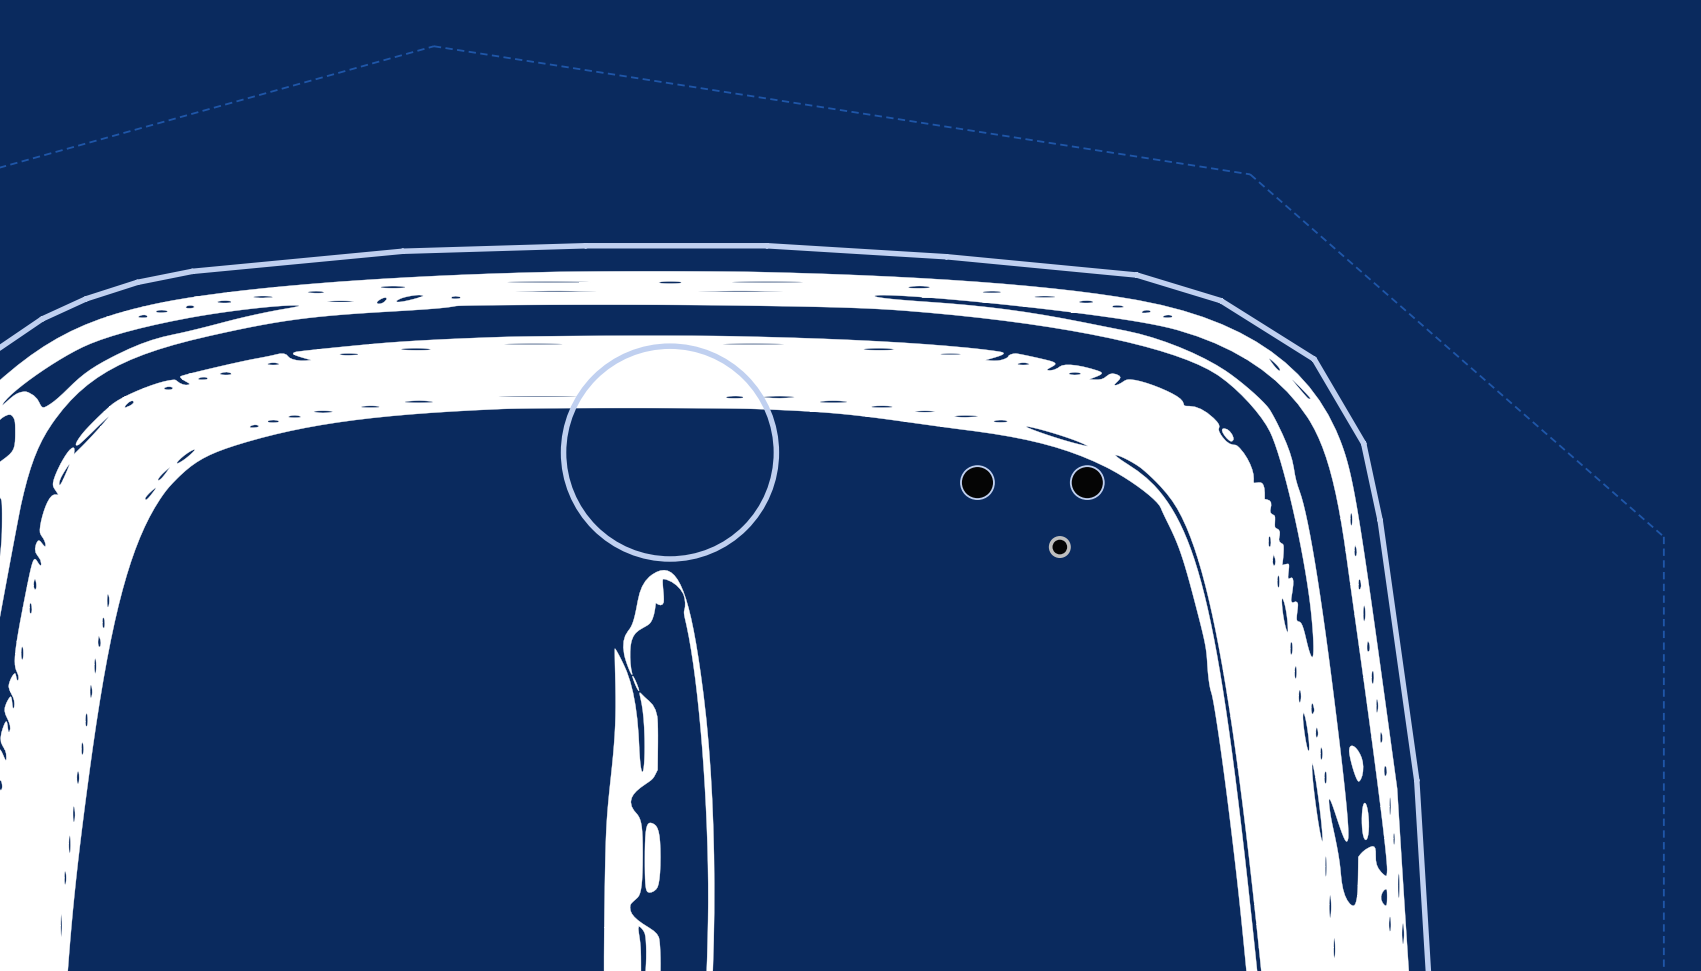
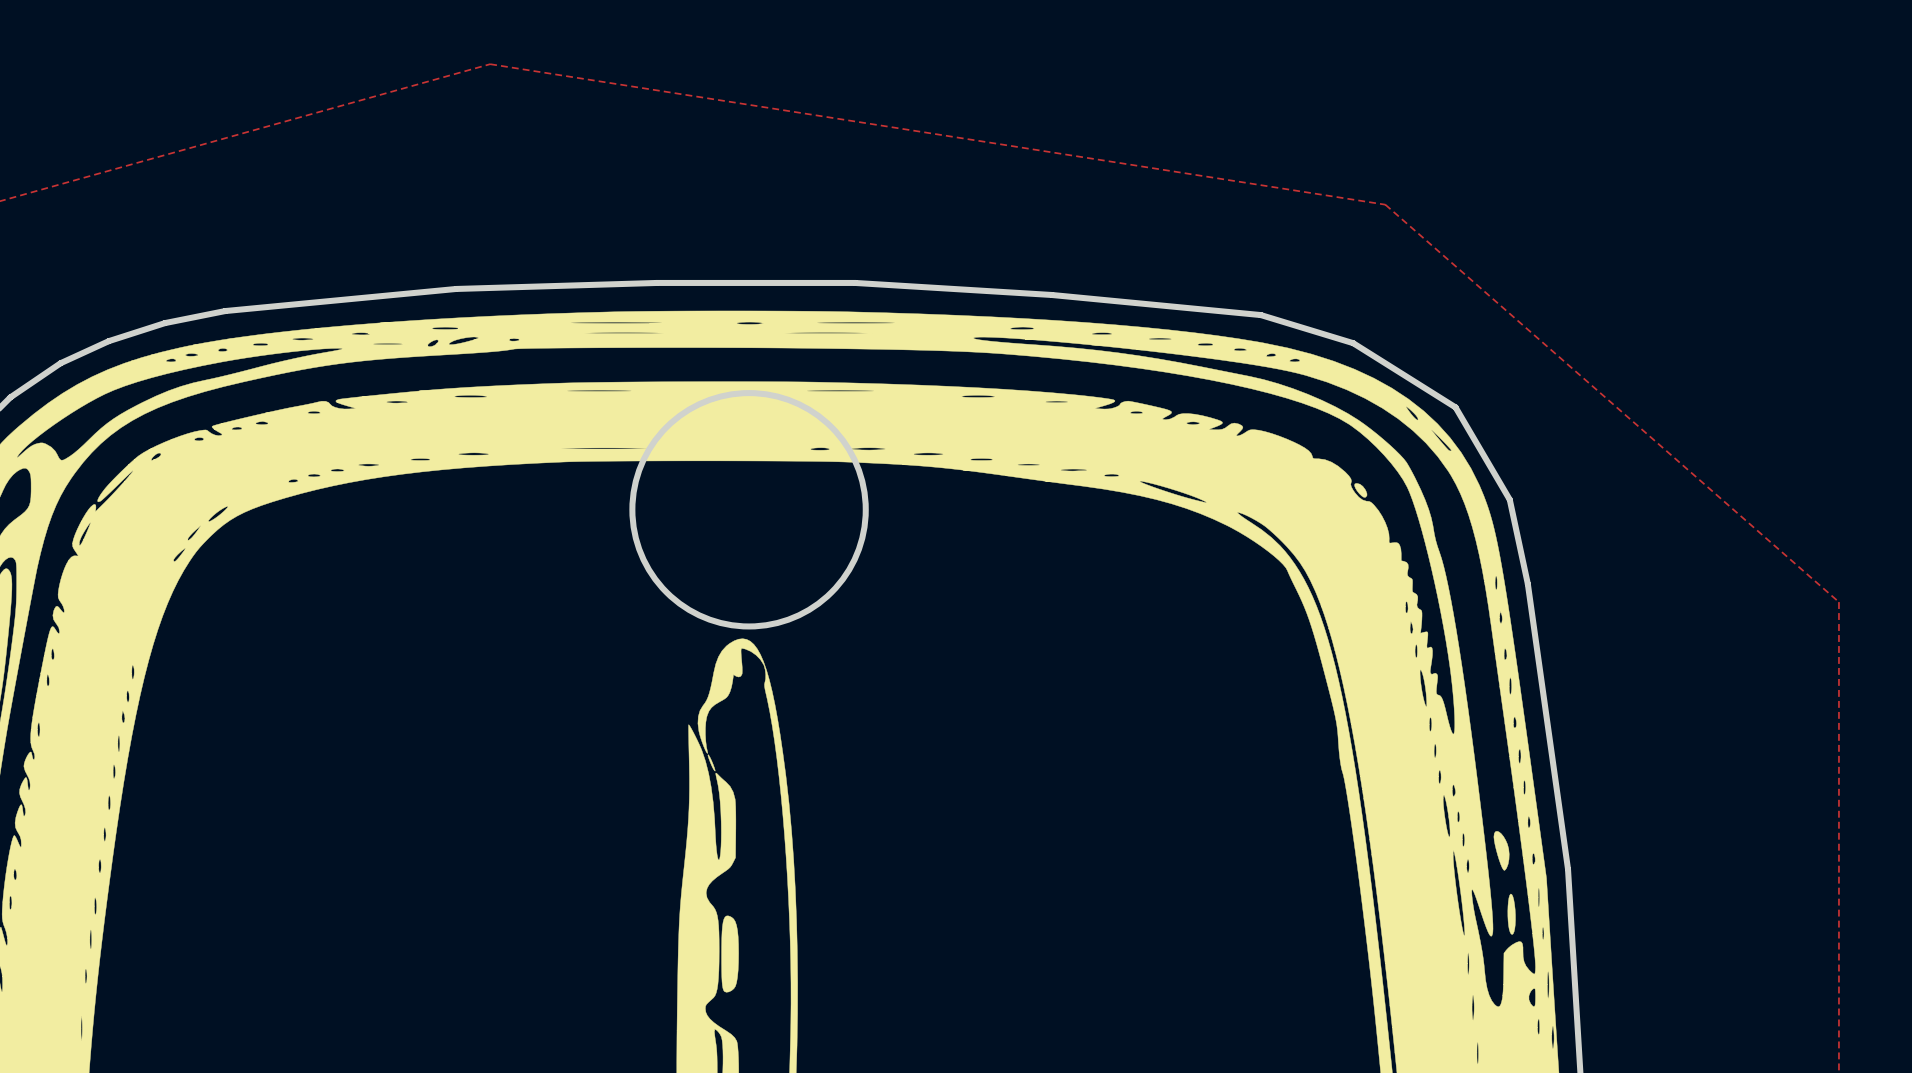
part: (1032, 482) -> none
via: (1059, 547) -> none

